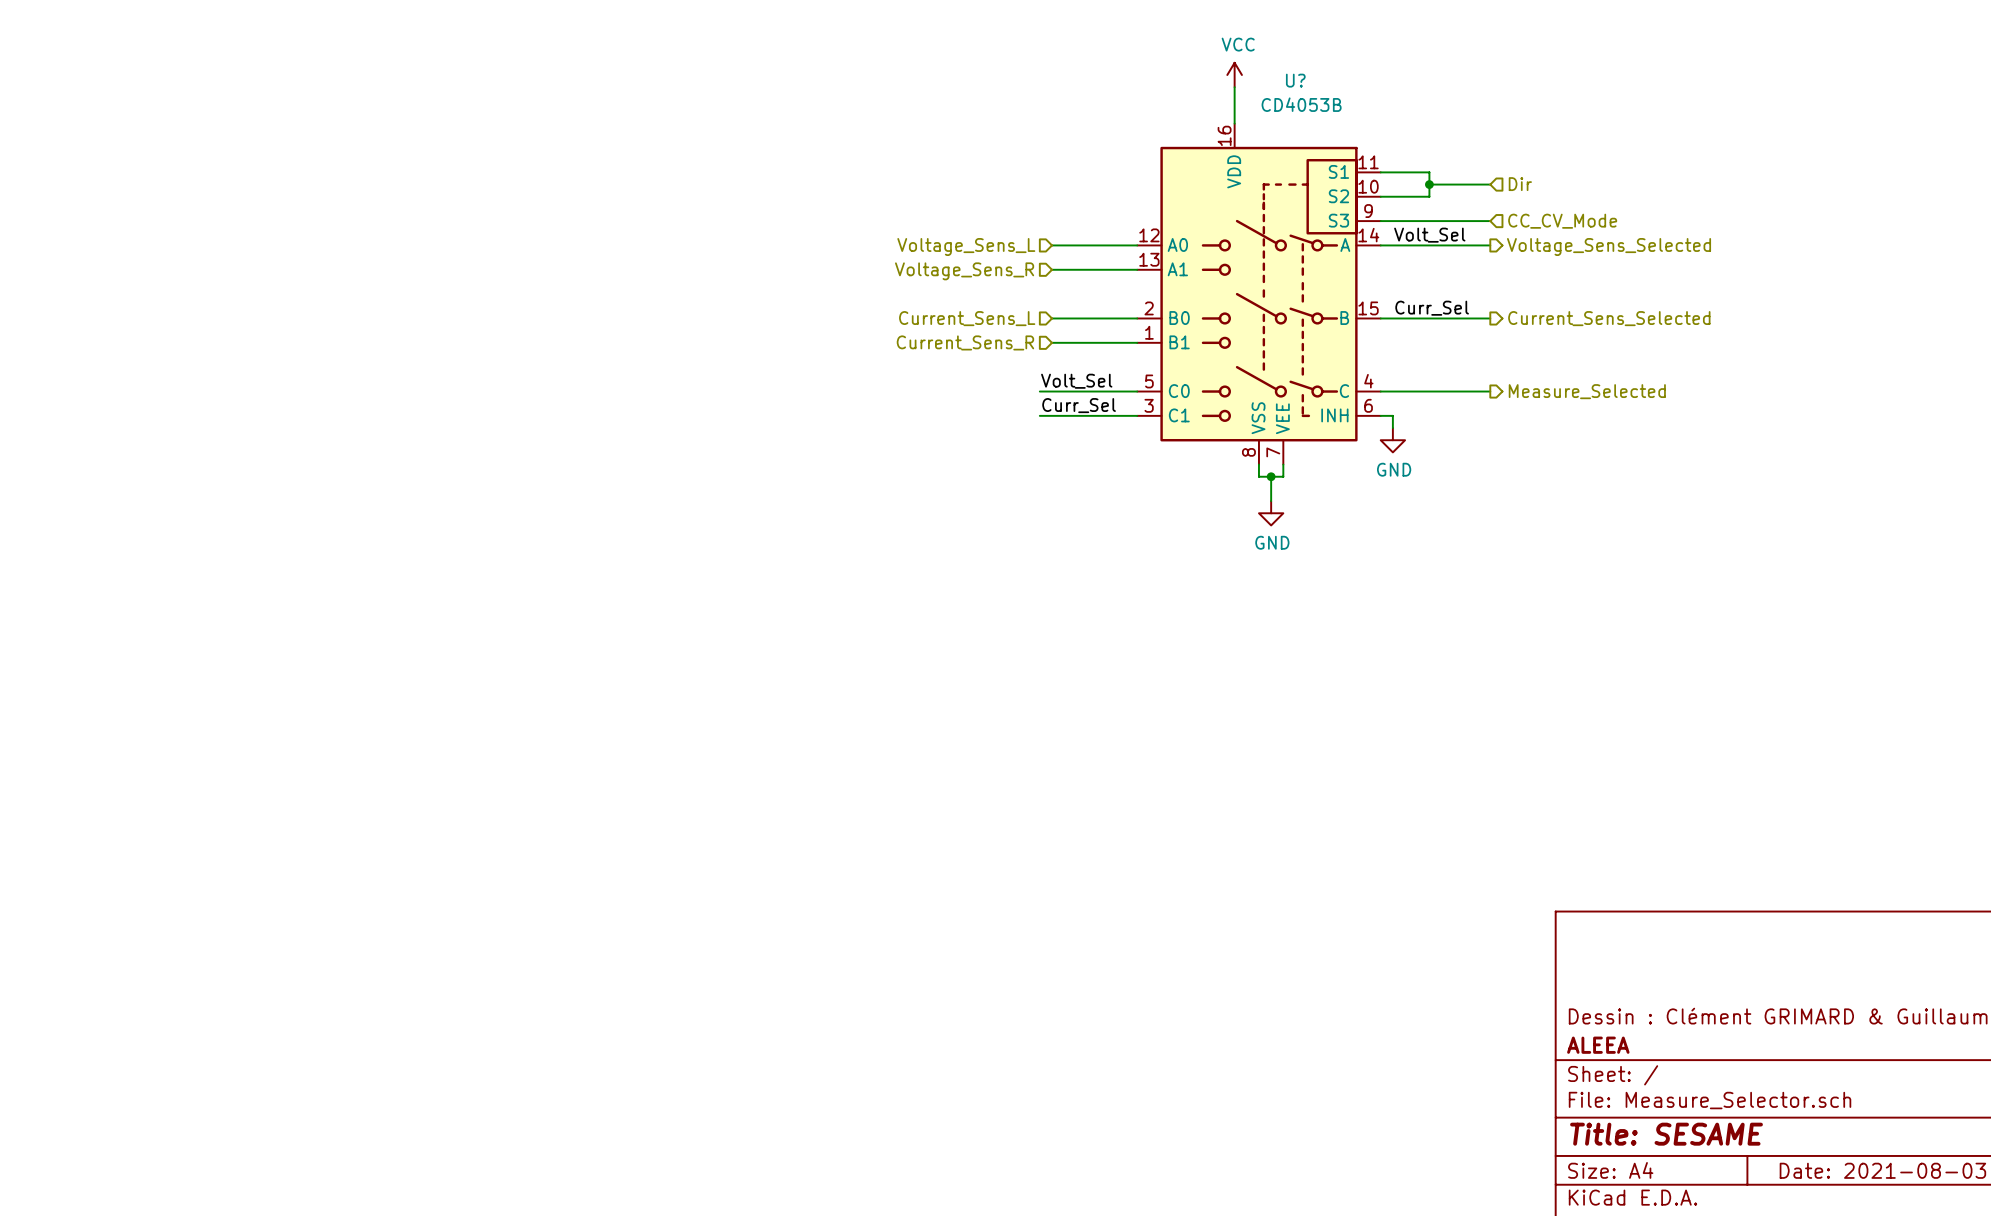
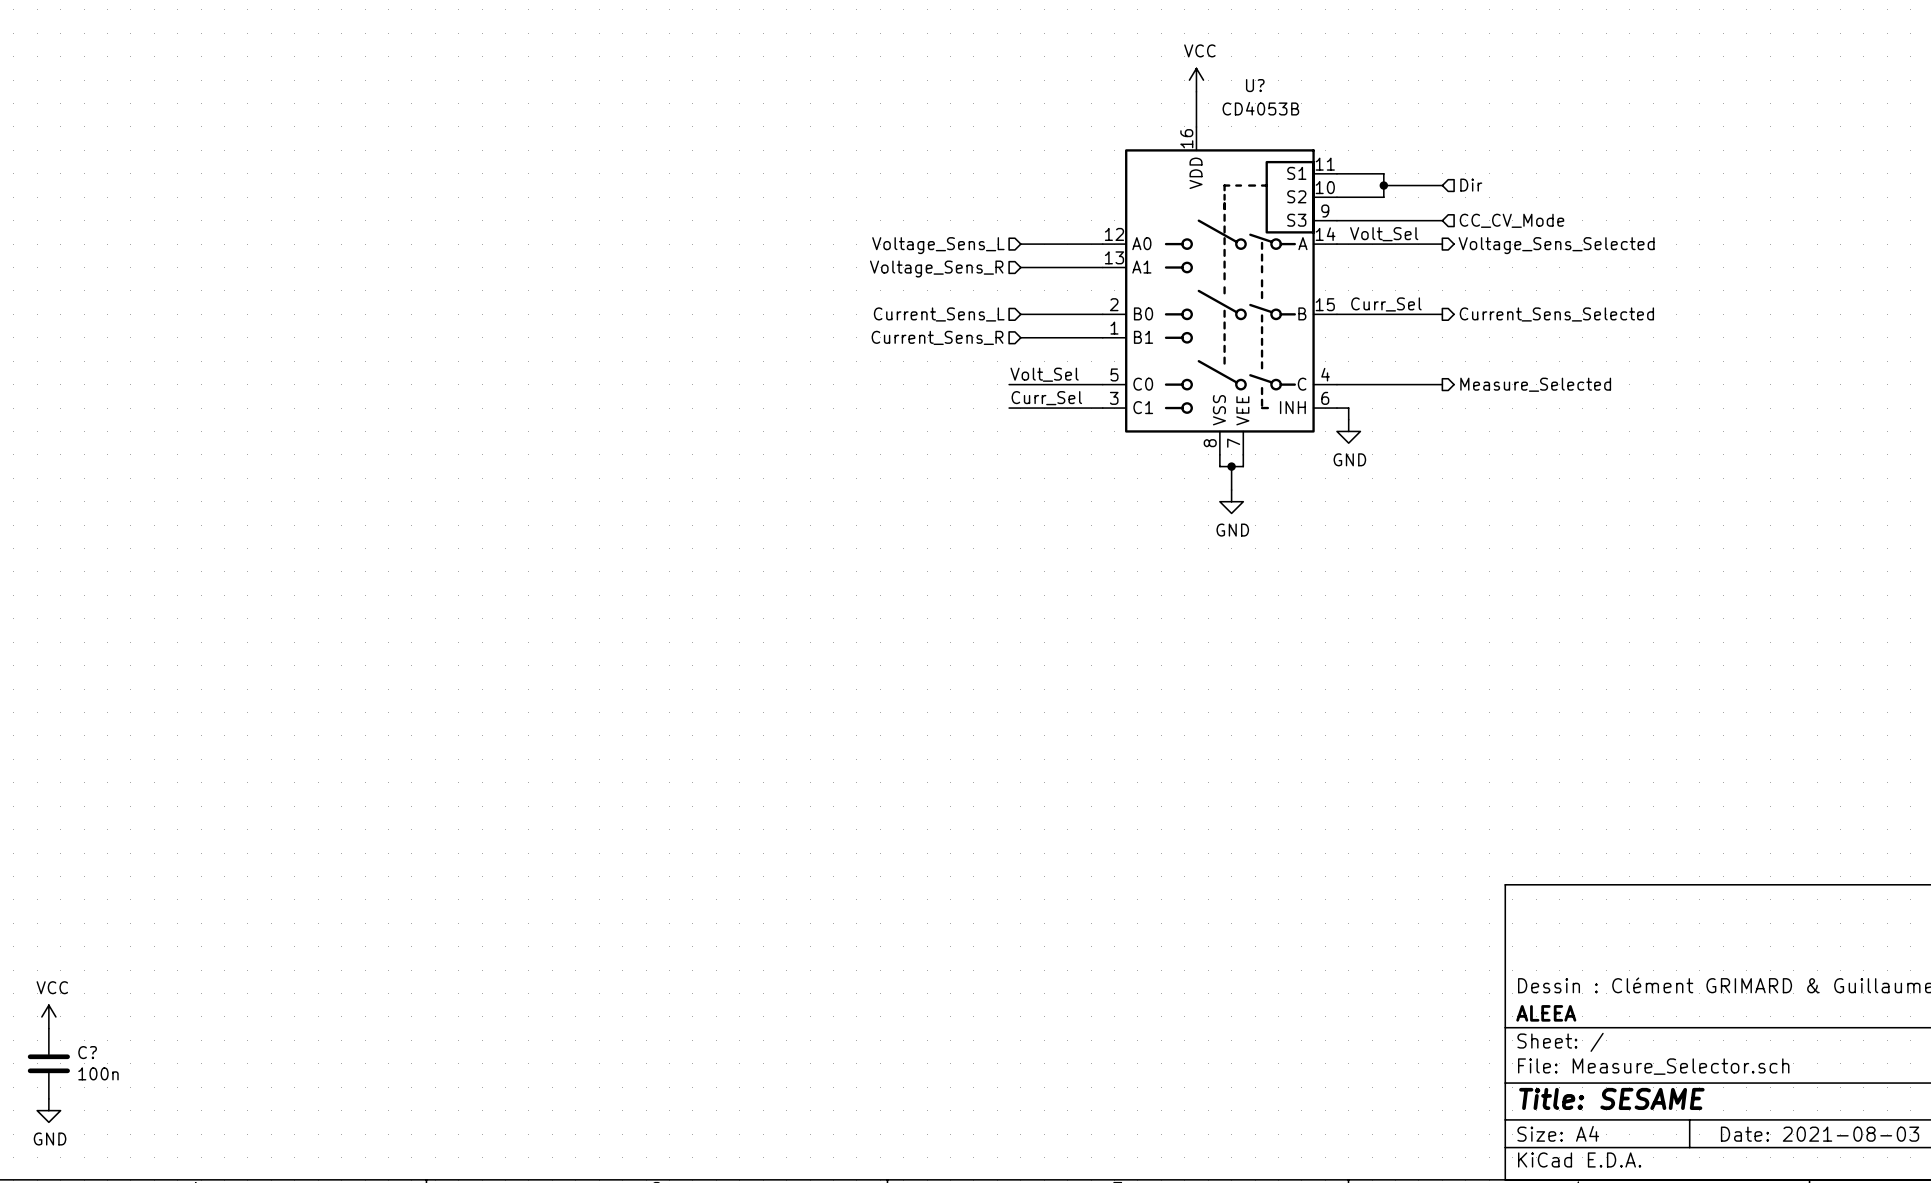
power symbol: none -> VCC (48, 1016)
C?: none -> 100n (48, 1063)
power symbol: none -> GND (48, 1110)

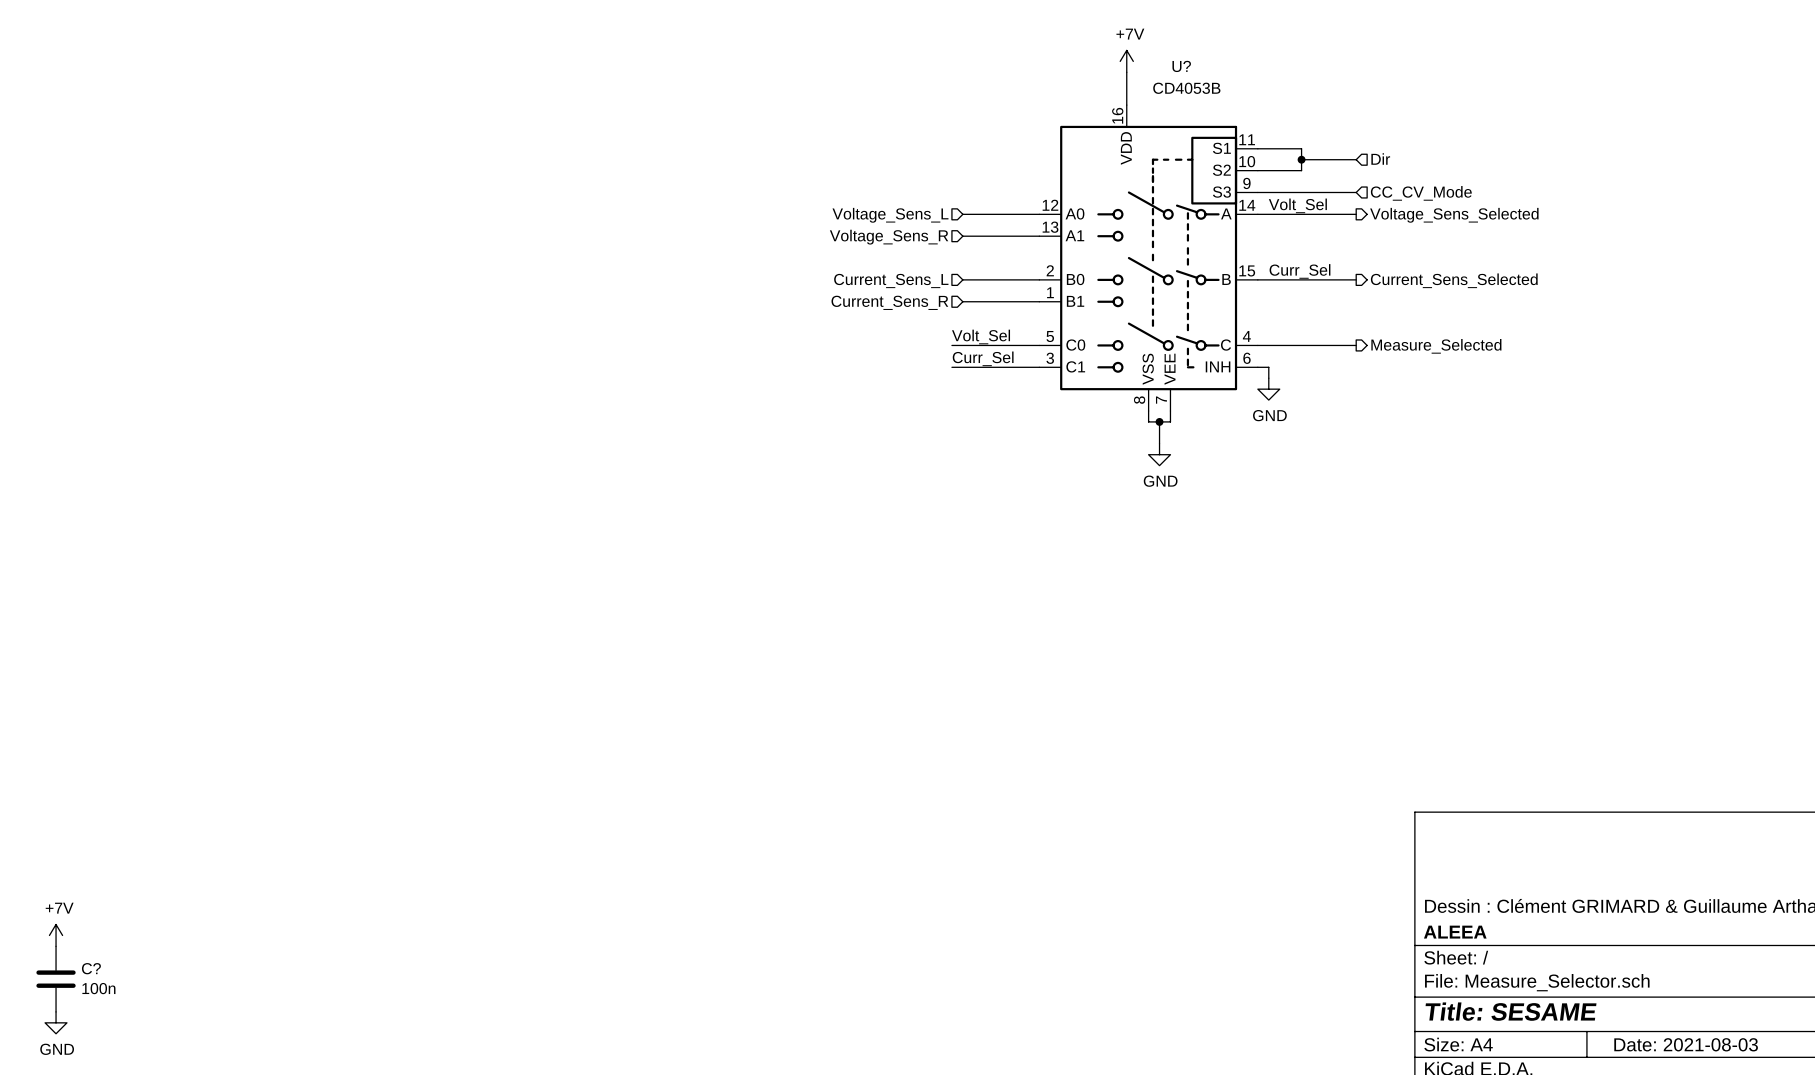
power symbol: VCC (1196, 80) -> +7V (1126, 61)
power symbol: VCC (48, 1016) -> +7V (56, 935)

